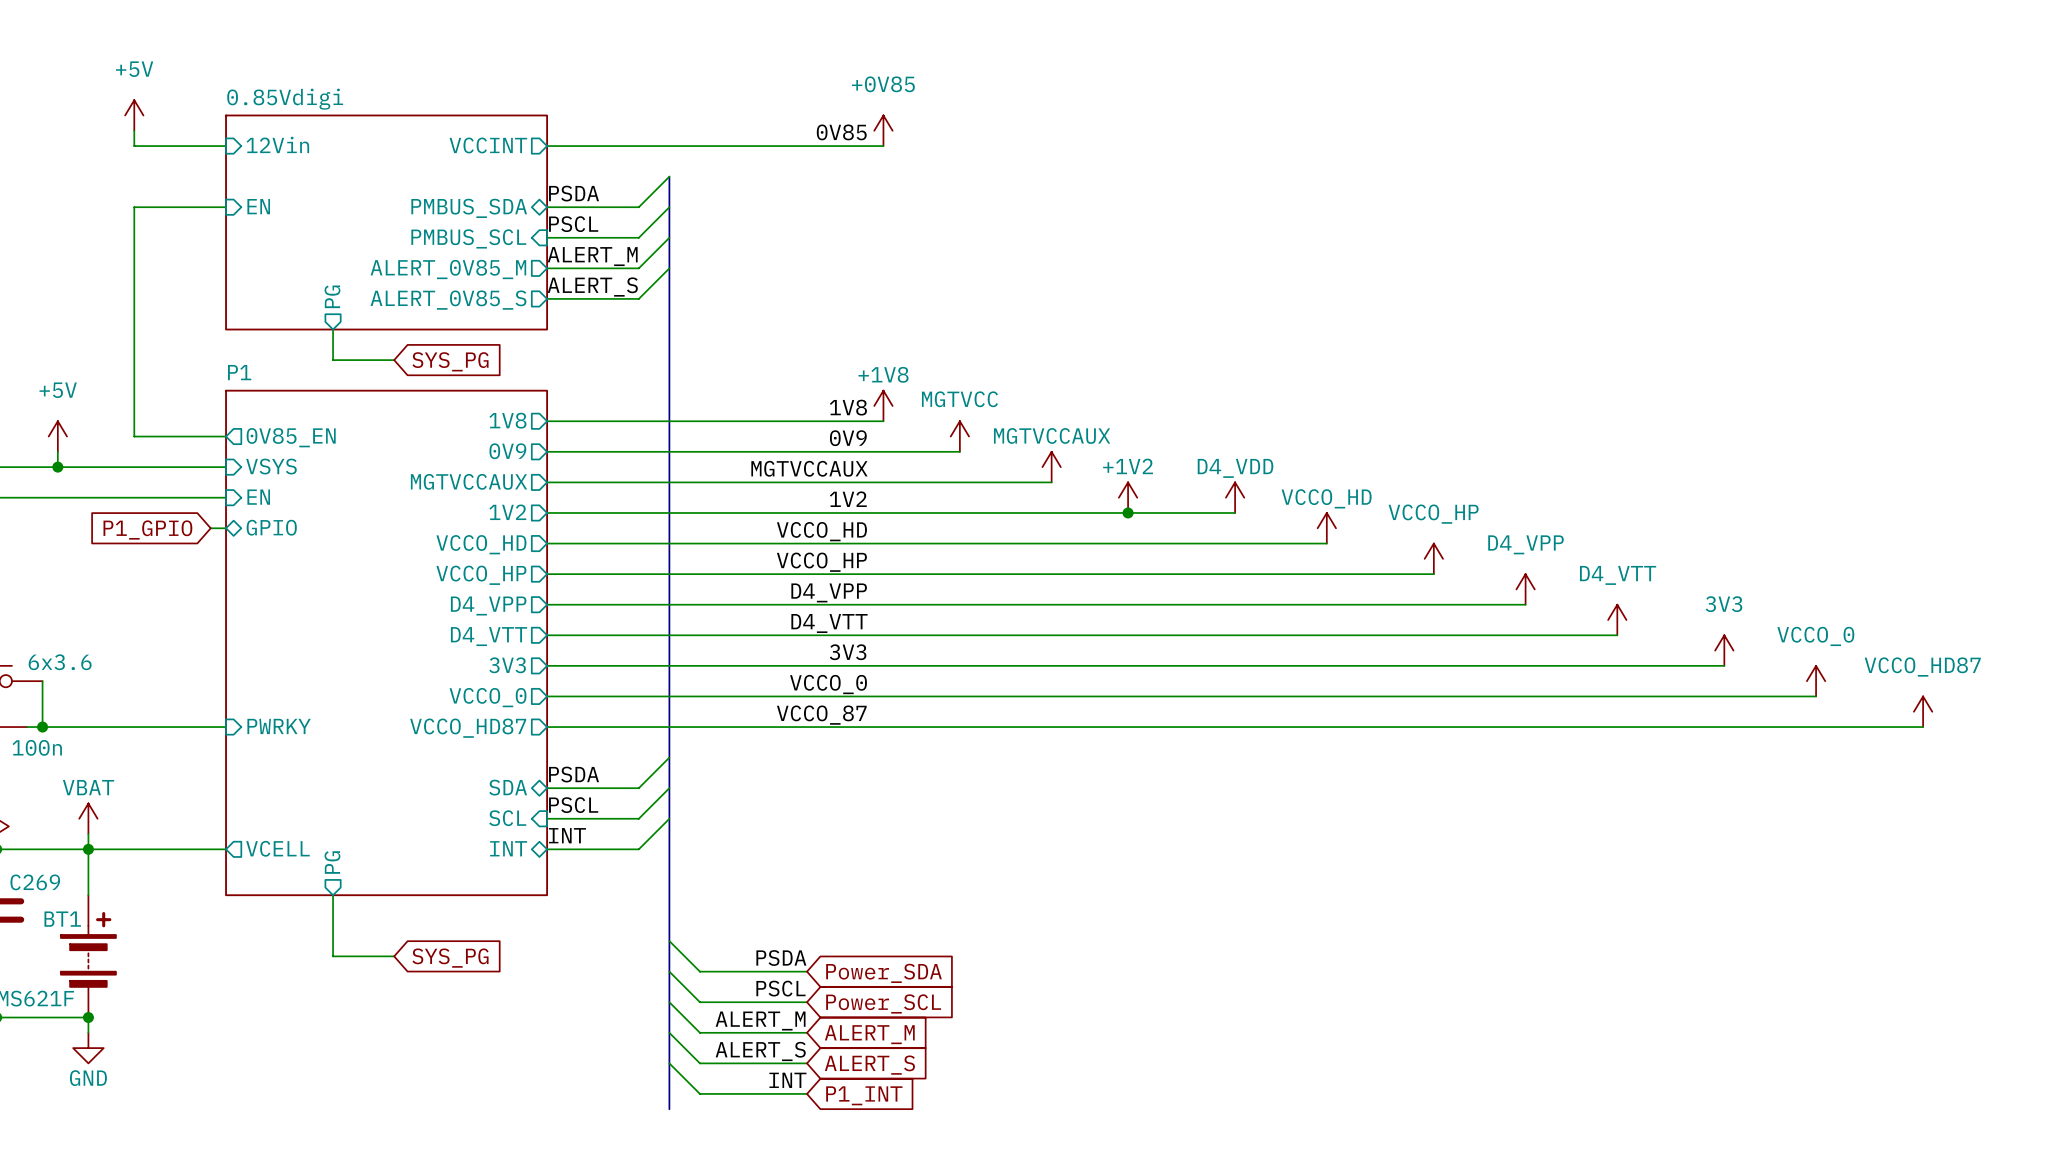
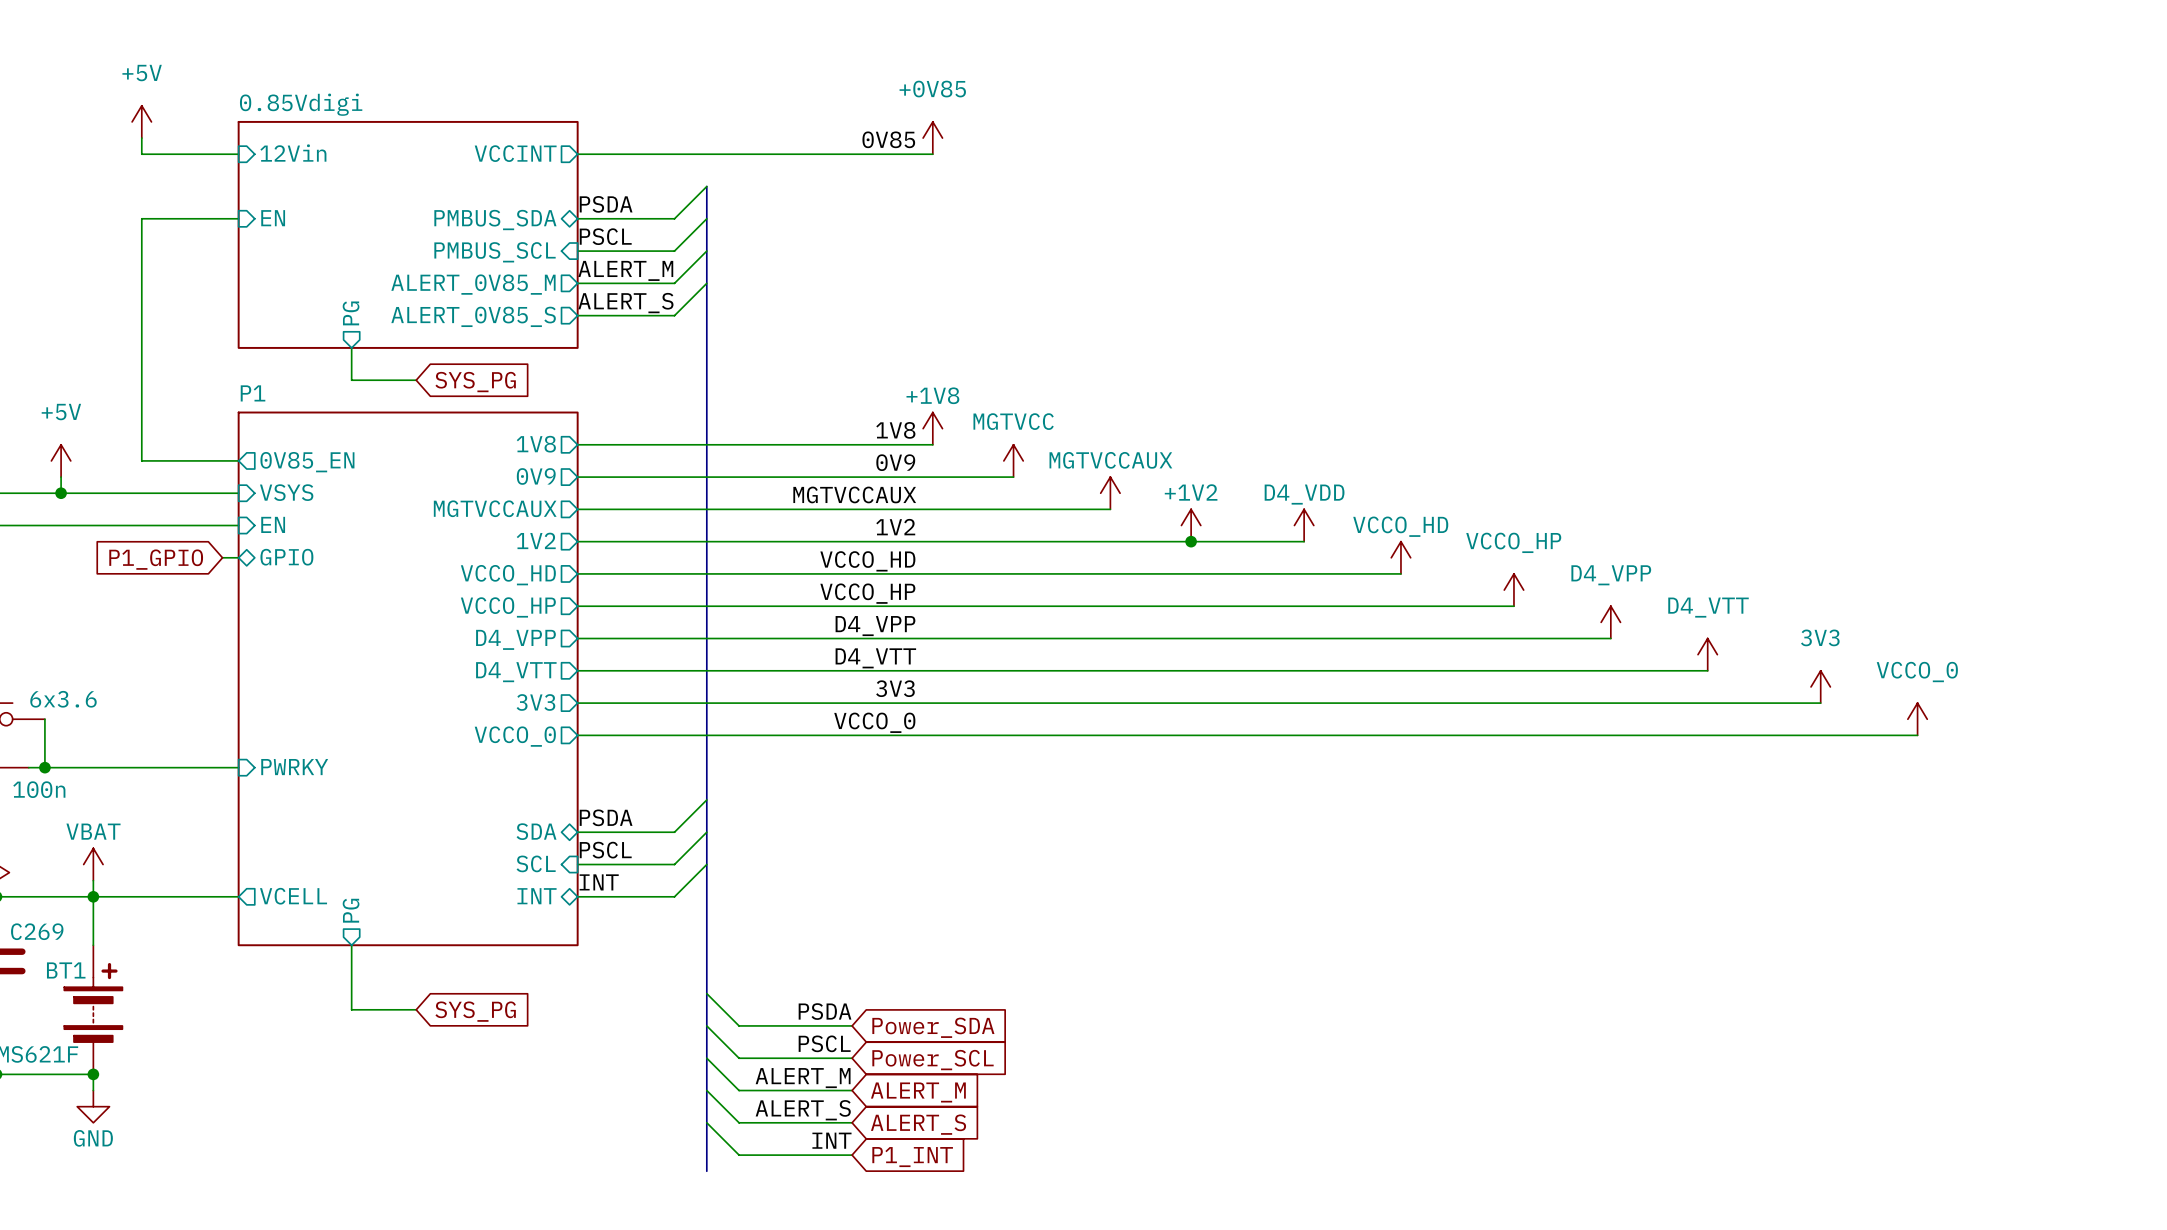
power symbol: VCCO_HD87 (1923, 711) -> none
label: VCCO_87 (821, 715) -> none
wire: (547, 727) (1923, 727) -> none
sheet pin: VCCO_HD87 (468, 728) -> none

